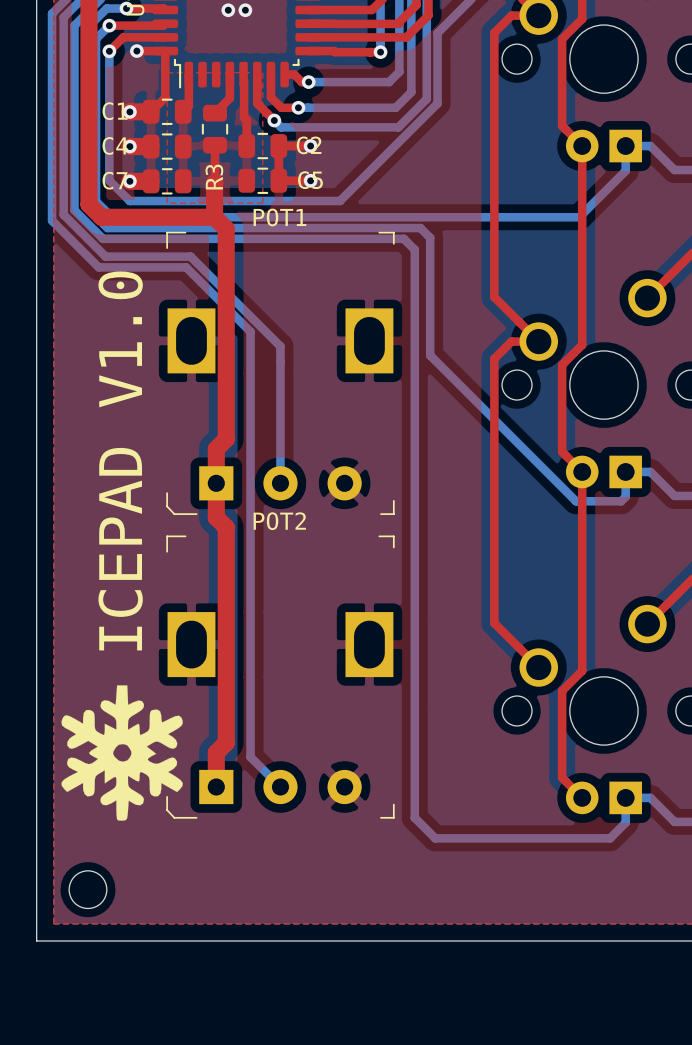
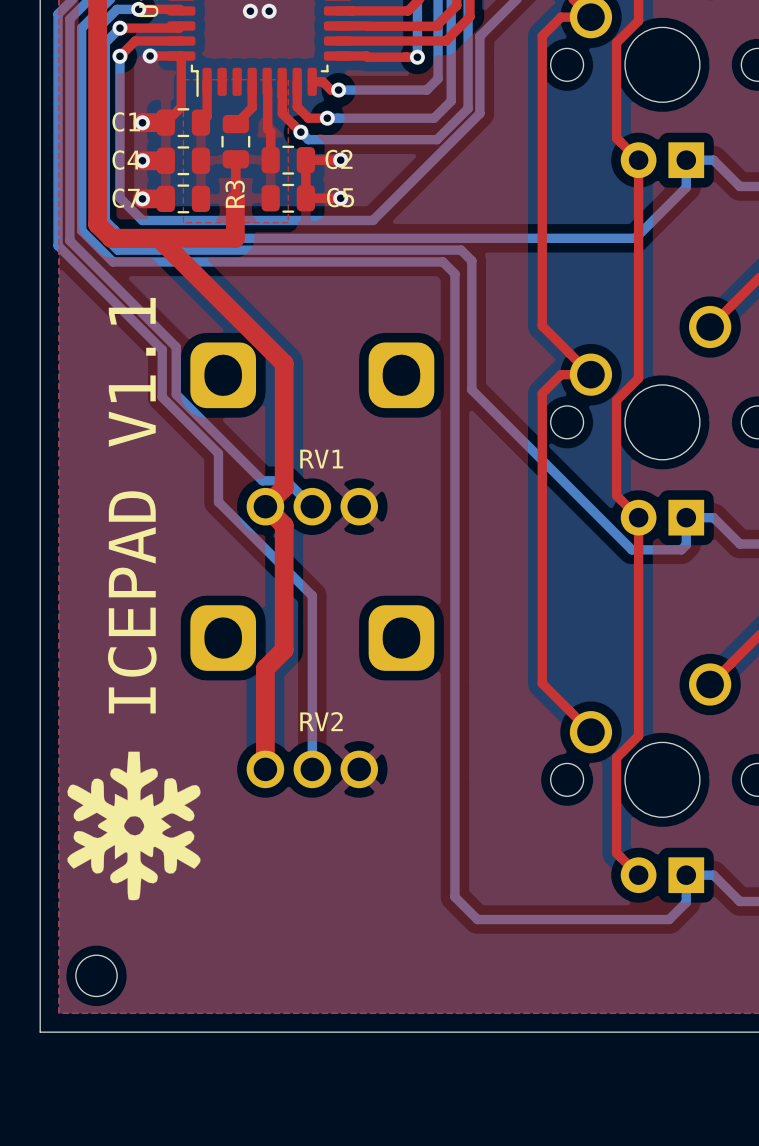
bottom track: (52, 12) (52, 220) (98, 267) (186, 267) (250, 331) (250, 757) (280, 787) -> (58, 14) (58, 245) (162, 349) (162, 397) (218, 453) (218, 501) (312, 595) (312, 769)
bottom track: (63, 214) (105, 256) (190, 256) (280, 346) (280, 483) -> (69, 235) (69, 240) (176, 347) (176, 394) (262, 480) (286, 480) (312, 506)
top track: none -> (158, 238) (284, 363) (284, 487) (265, 506) (284, 525) (284, 649) (265, 668) (265, 769)
top track: (214, 217) (226, 228) (226, 439) (216, 449) (216, 517) (226, 527) (226, 742) (216, 752) (216, 787) -> none
POT1: (280, 373) -> none
RV1: none -> (312, 433)
text: ICEPAD V1.0 (120, 460) -> ICEPAD V1.1 (132, 505)
RV2: none -> (312, 696)
POT2: (280, 677) -> none

